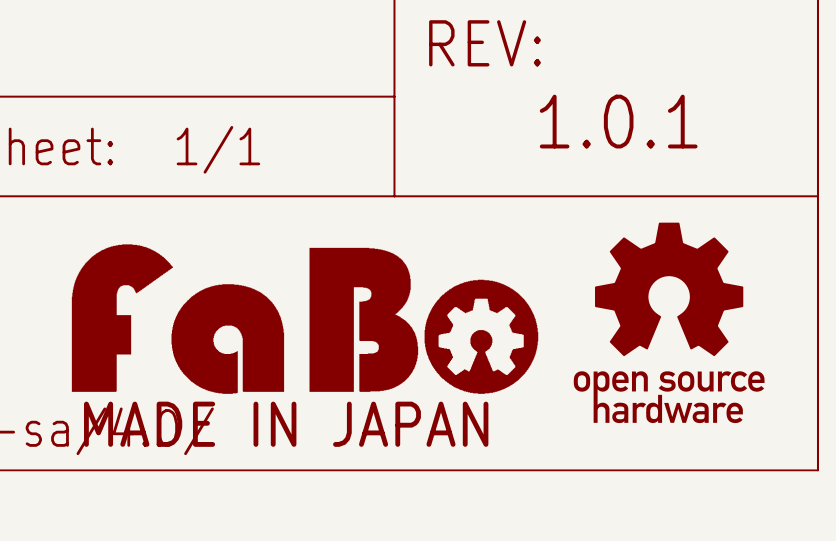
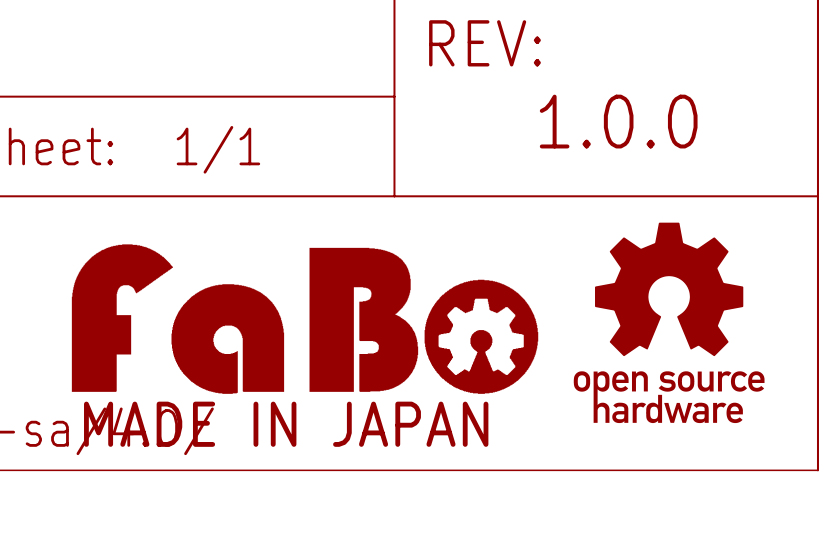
text: 1.0.1 (618, 121) -> 1.0.0 (618, 121)

